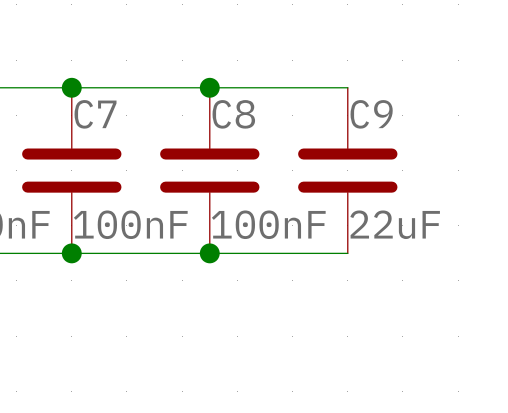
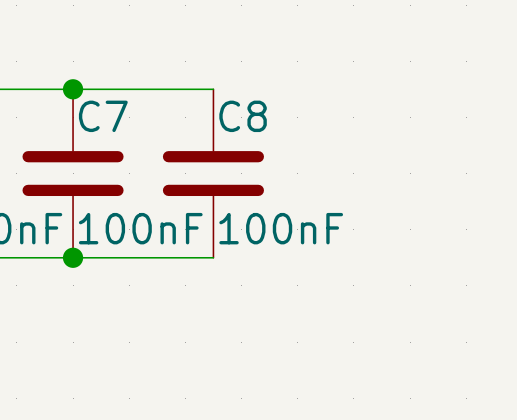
wire: (209, 87) (347, 87) -> none
junction: (209, 87) -> none
C9: 22uF (347, 170) -> none
wire: (209, 253) (347, 253) -> none
junction: (209, 253) -> none

